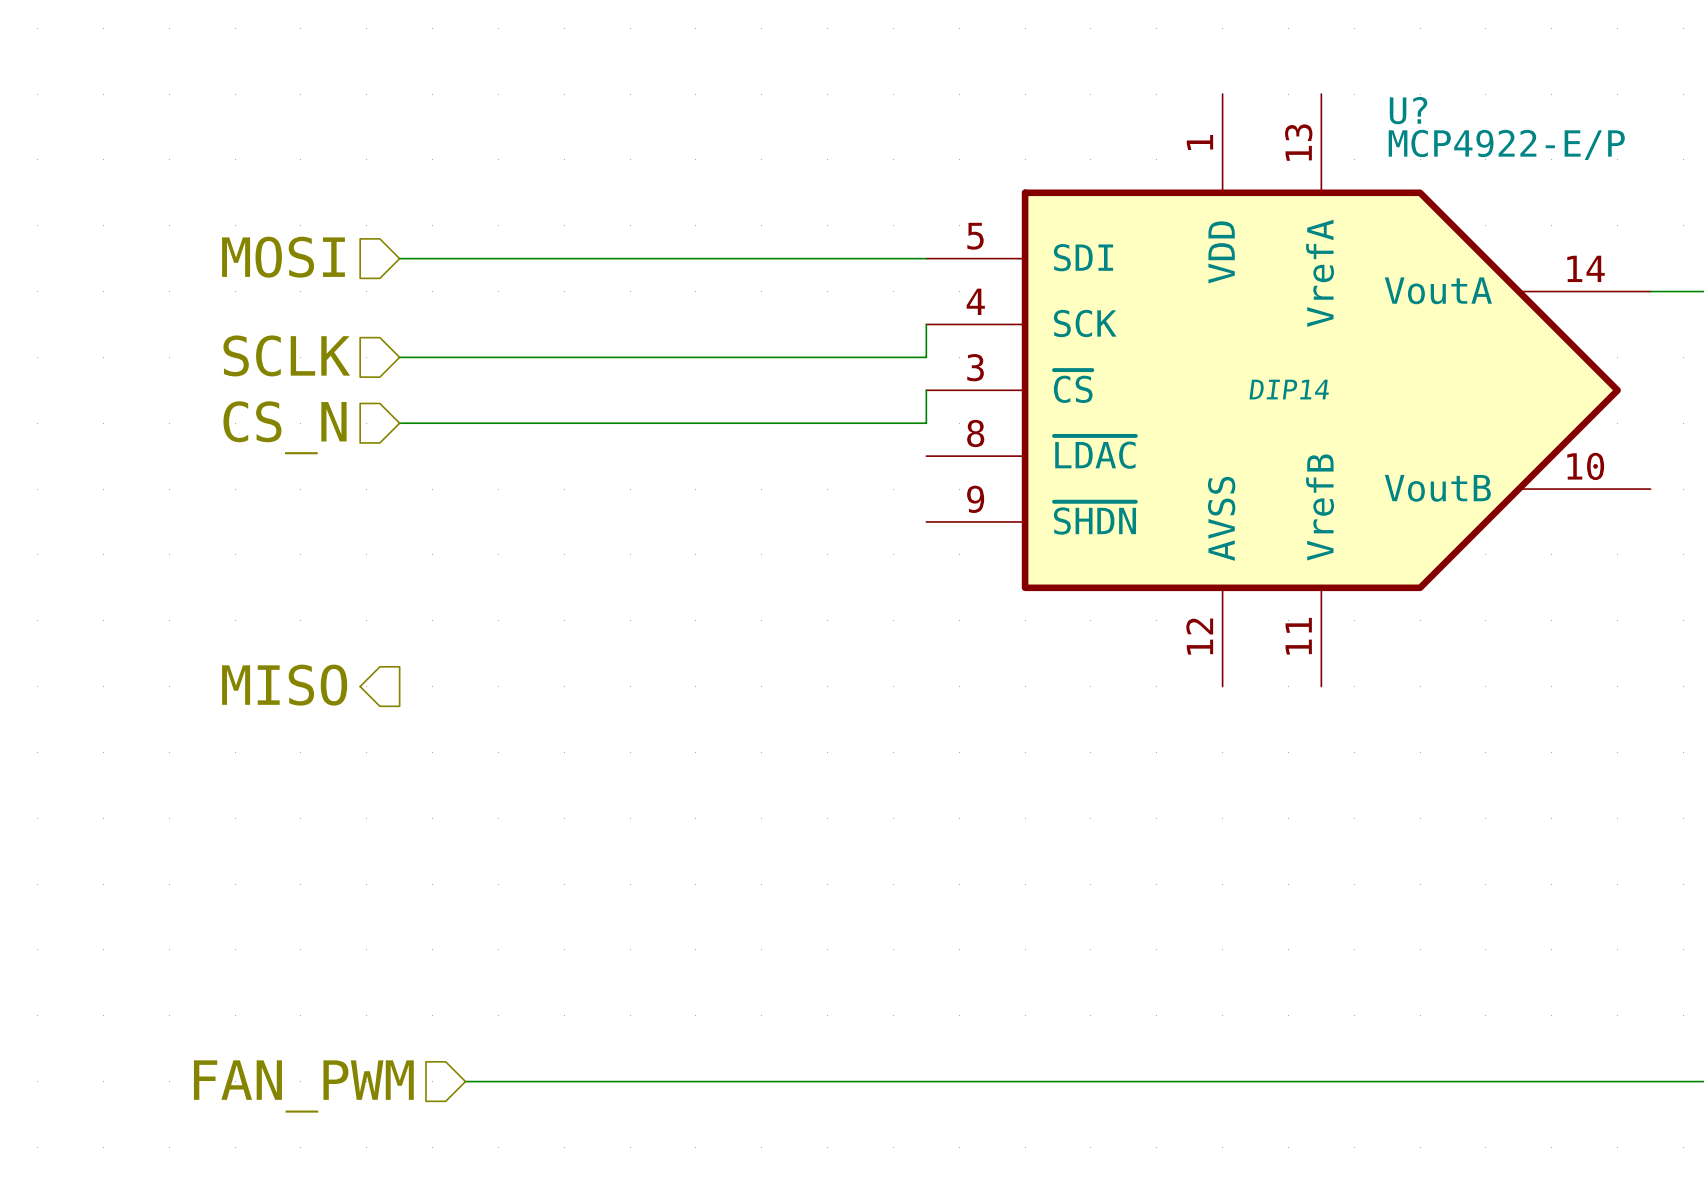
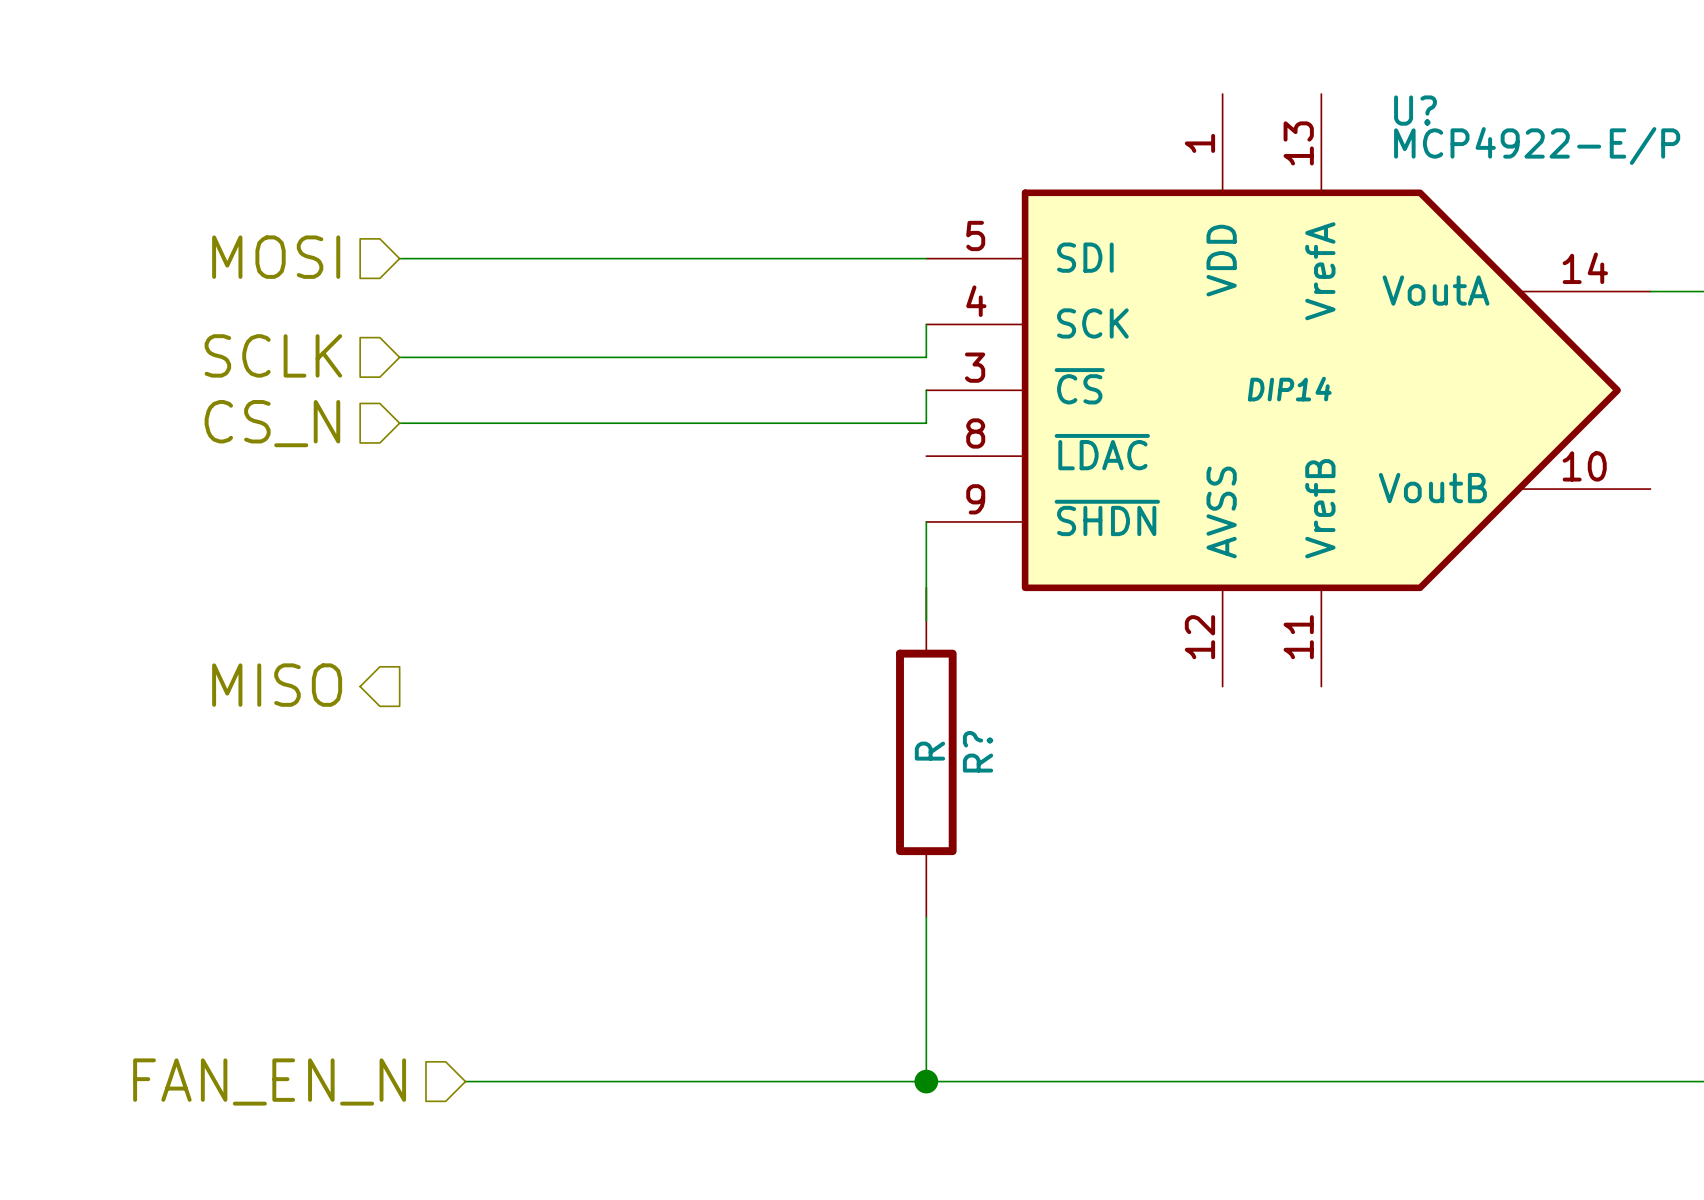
wire: none -> (926, 521) (926, 620)
R?: none -> R (926, 752)
wire: none -> (926, 916) (926, 1081)
junction: none -> (926, 1081)
hierarchical label: FAN_PWM (303, 1086) -> FAN_EN_N (269, 1081)

